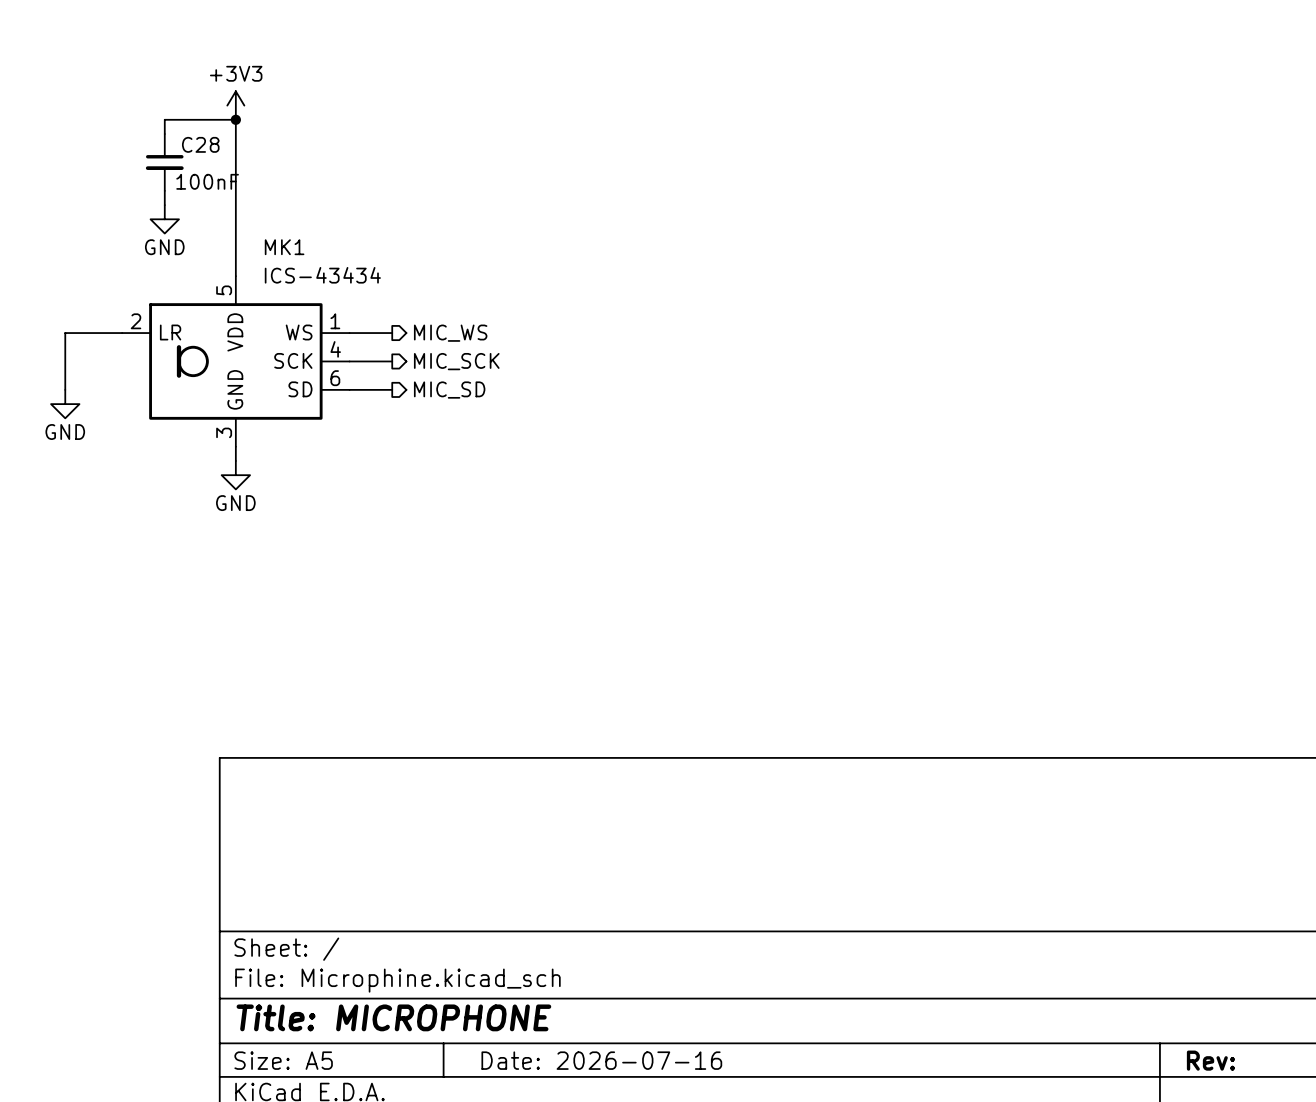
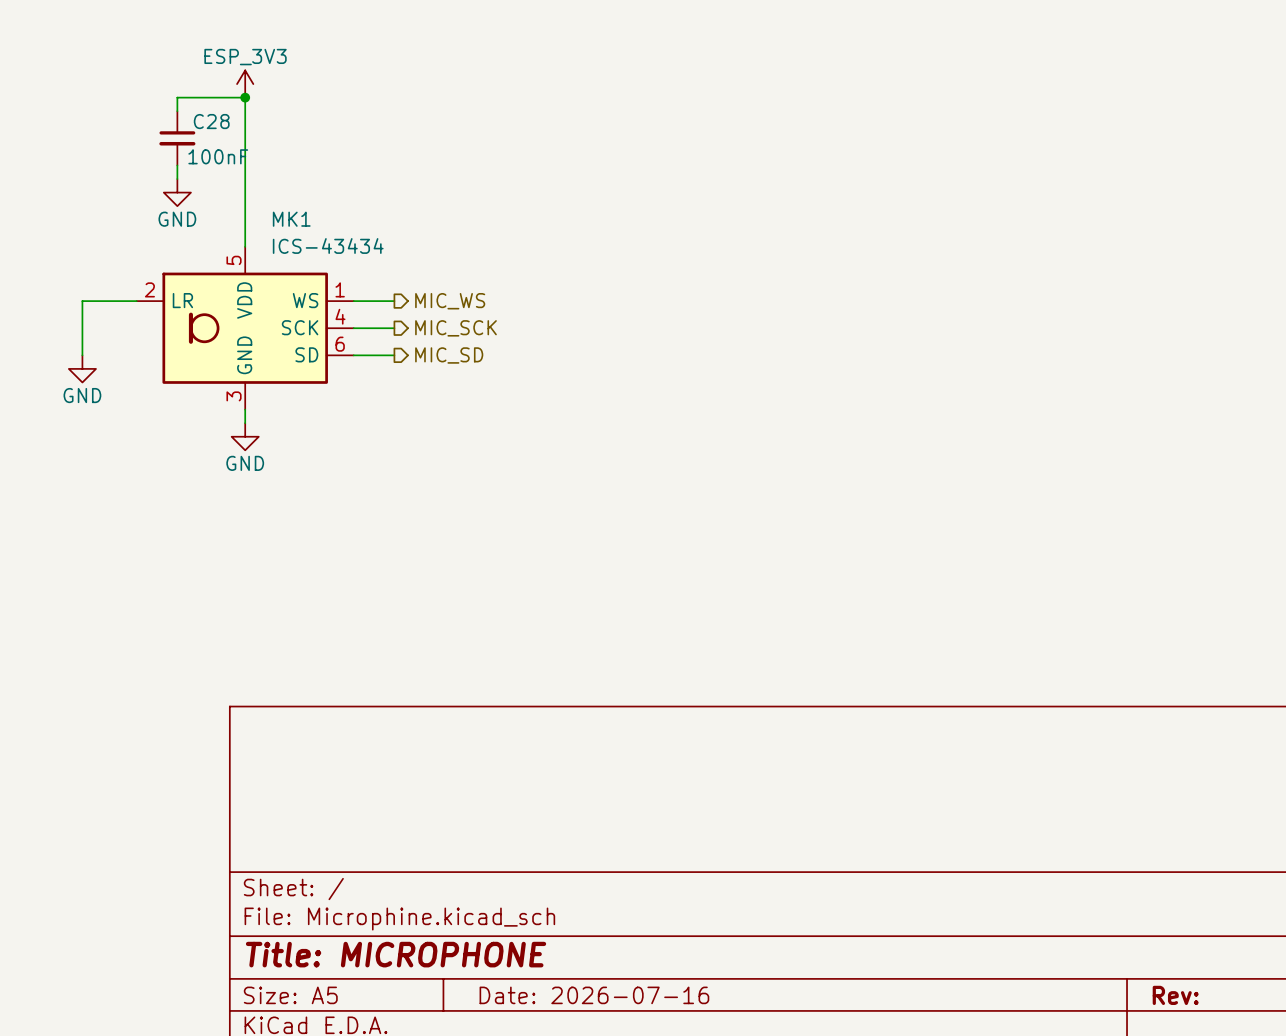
power symbol: +3V3 (235, 105) -> ESP_3V3 (245, 84)

